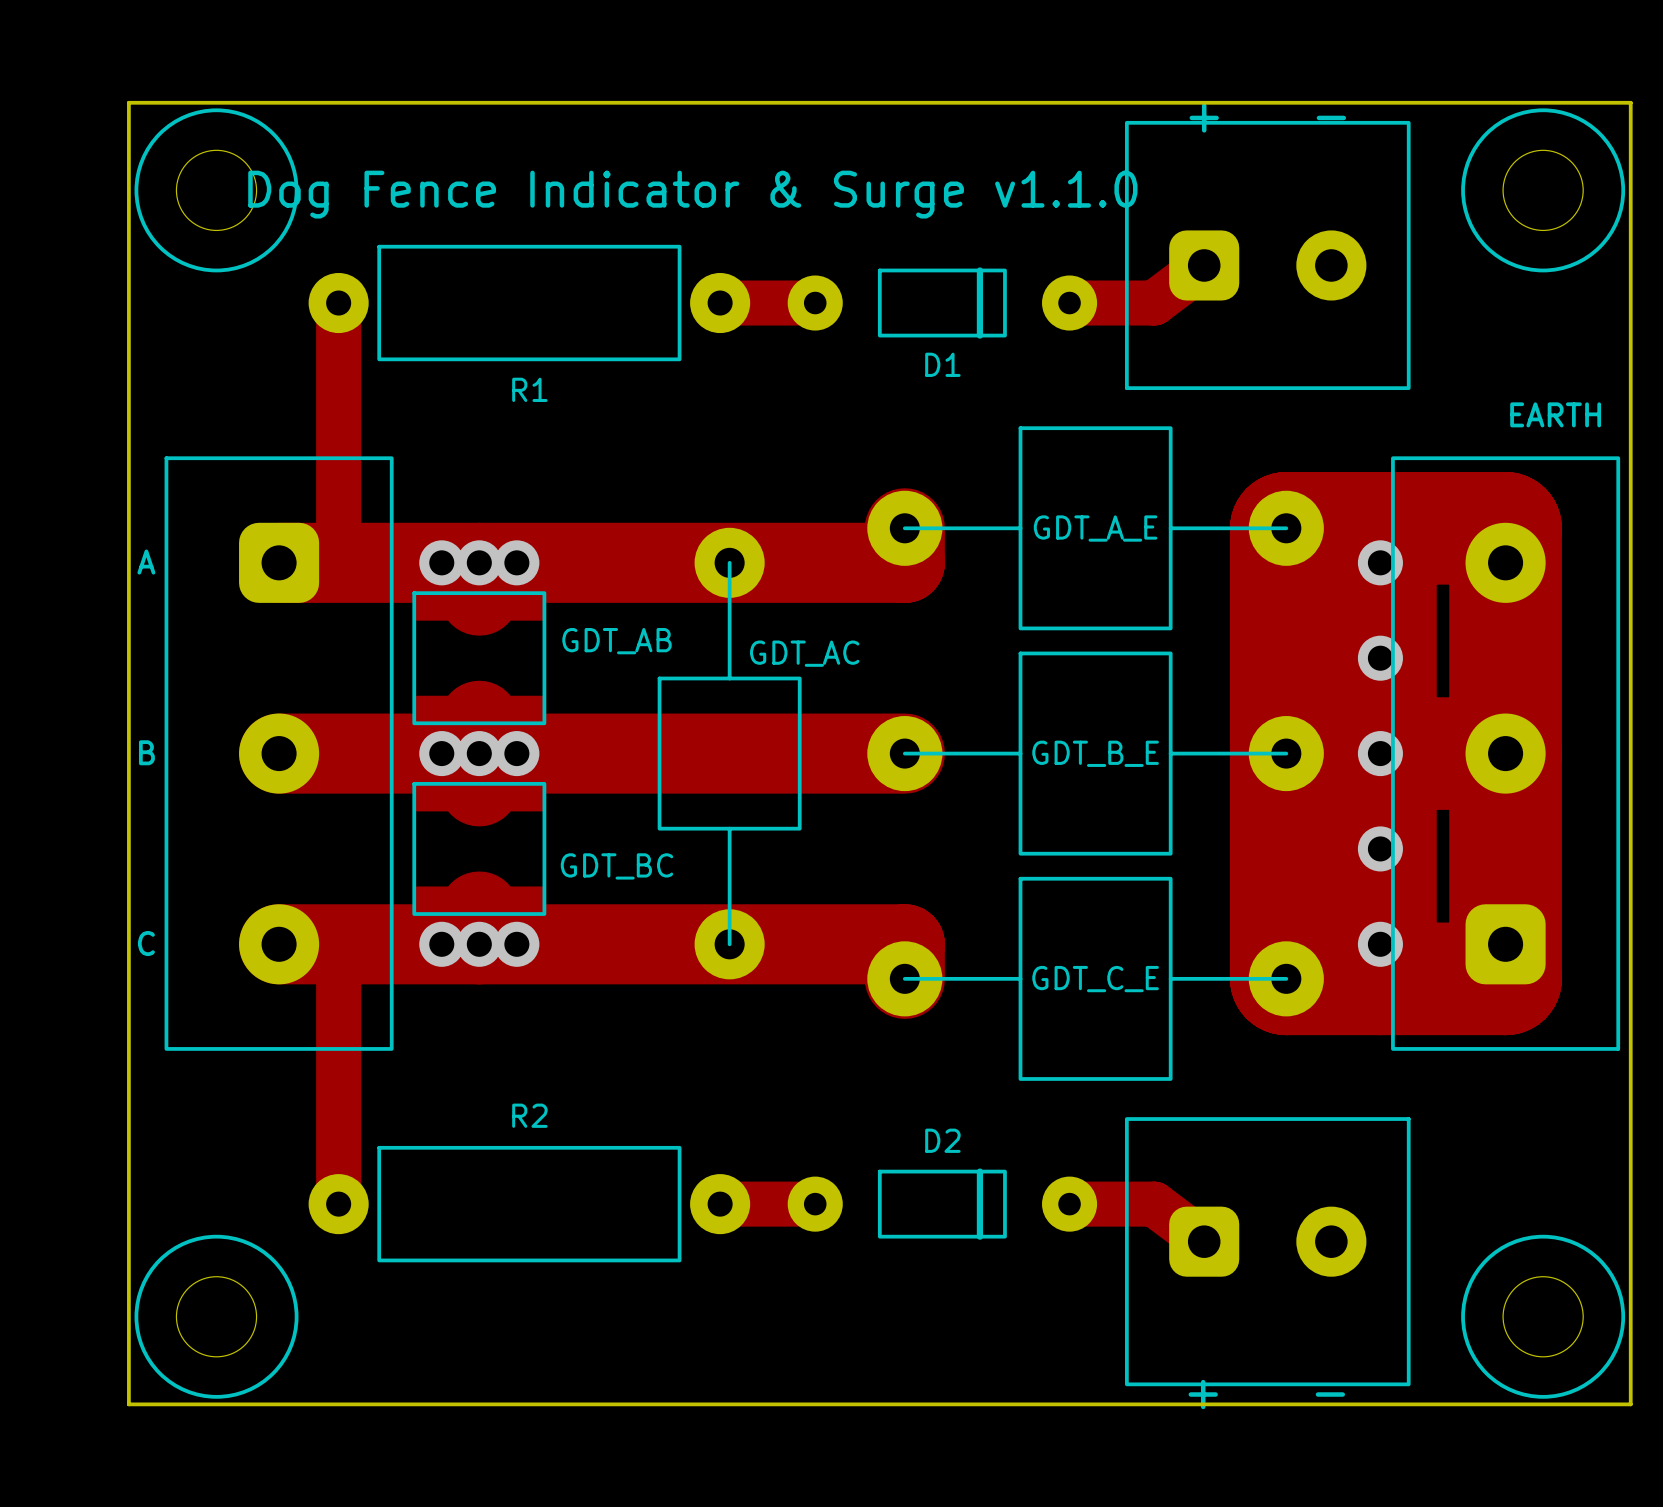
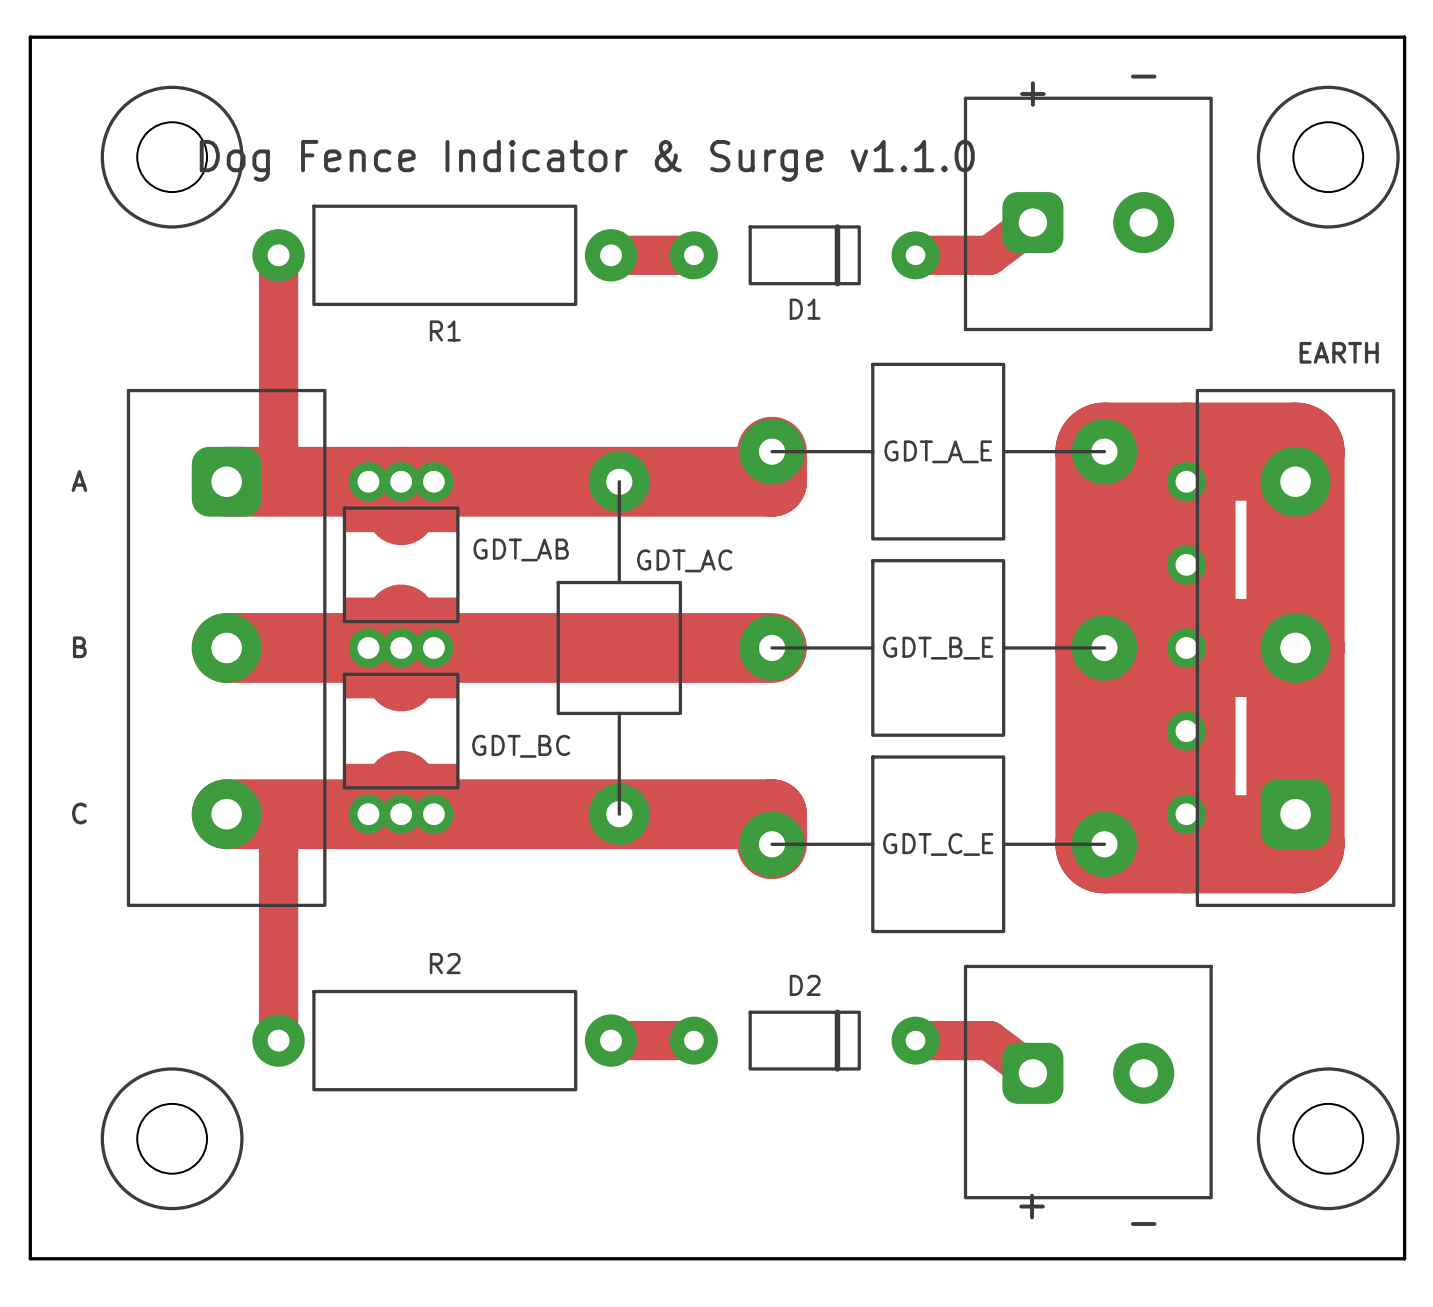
board edge: (1630, 102) (128, 102) (128, 1404) (1630, 1404) -> (1404, 80) (1404, 37) (30, 37) (30, 1258) (1404, 1258) (1404, 1215)
text position: - (1331, 117) -> - (1143, 76)
part text position: A (146, 562) -> A (79, 481)
part text position: B (146, 752) -> B (79, 647)
part text position: C (146, 943) -> C (79, 813)
text position: - (1330, 1394) -> - (1143, 1223)

